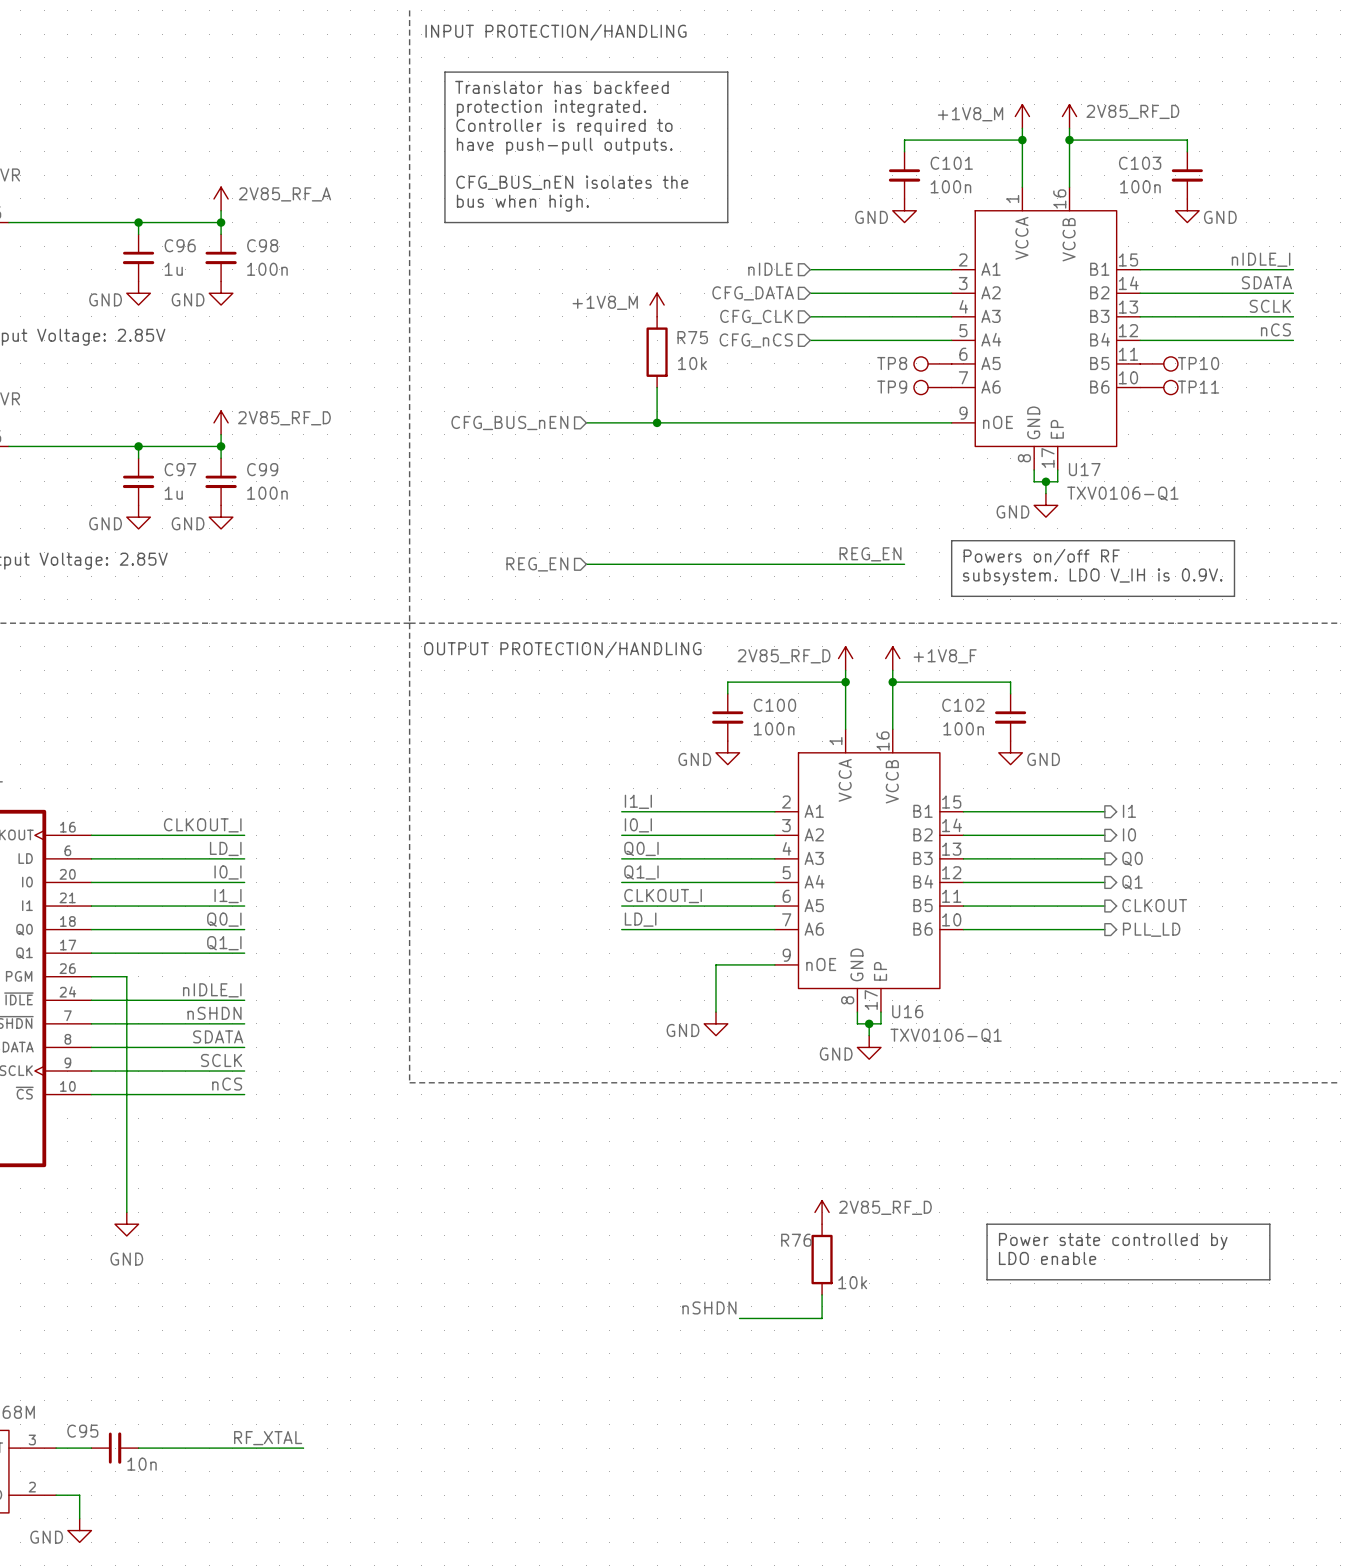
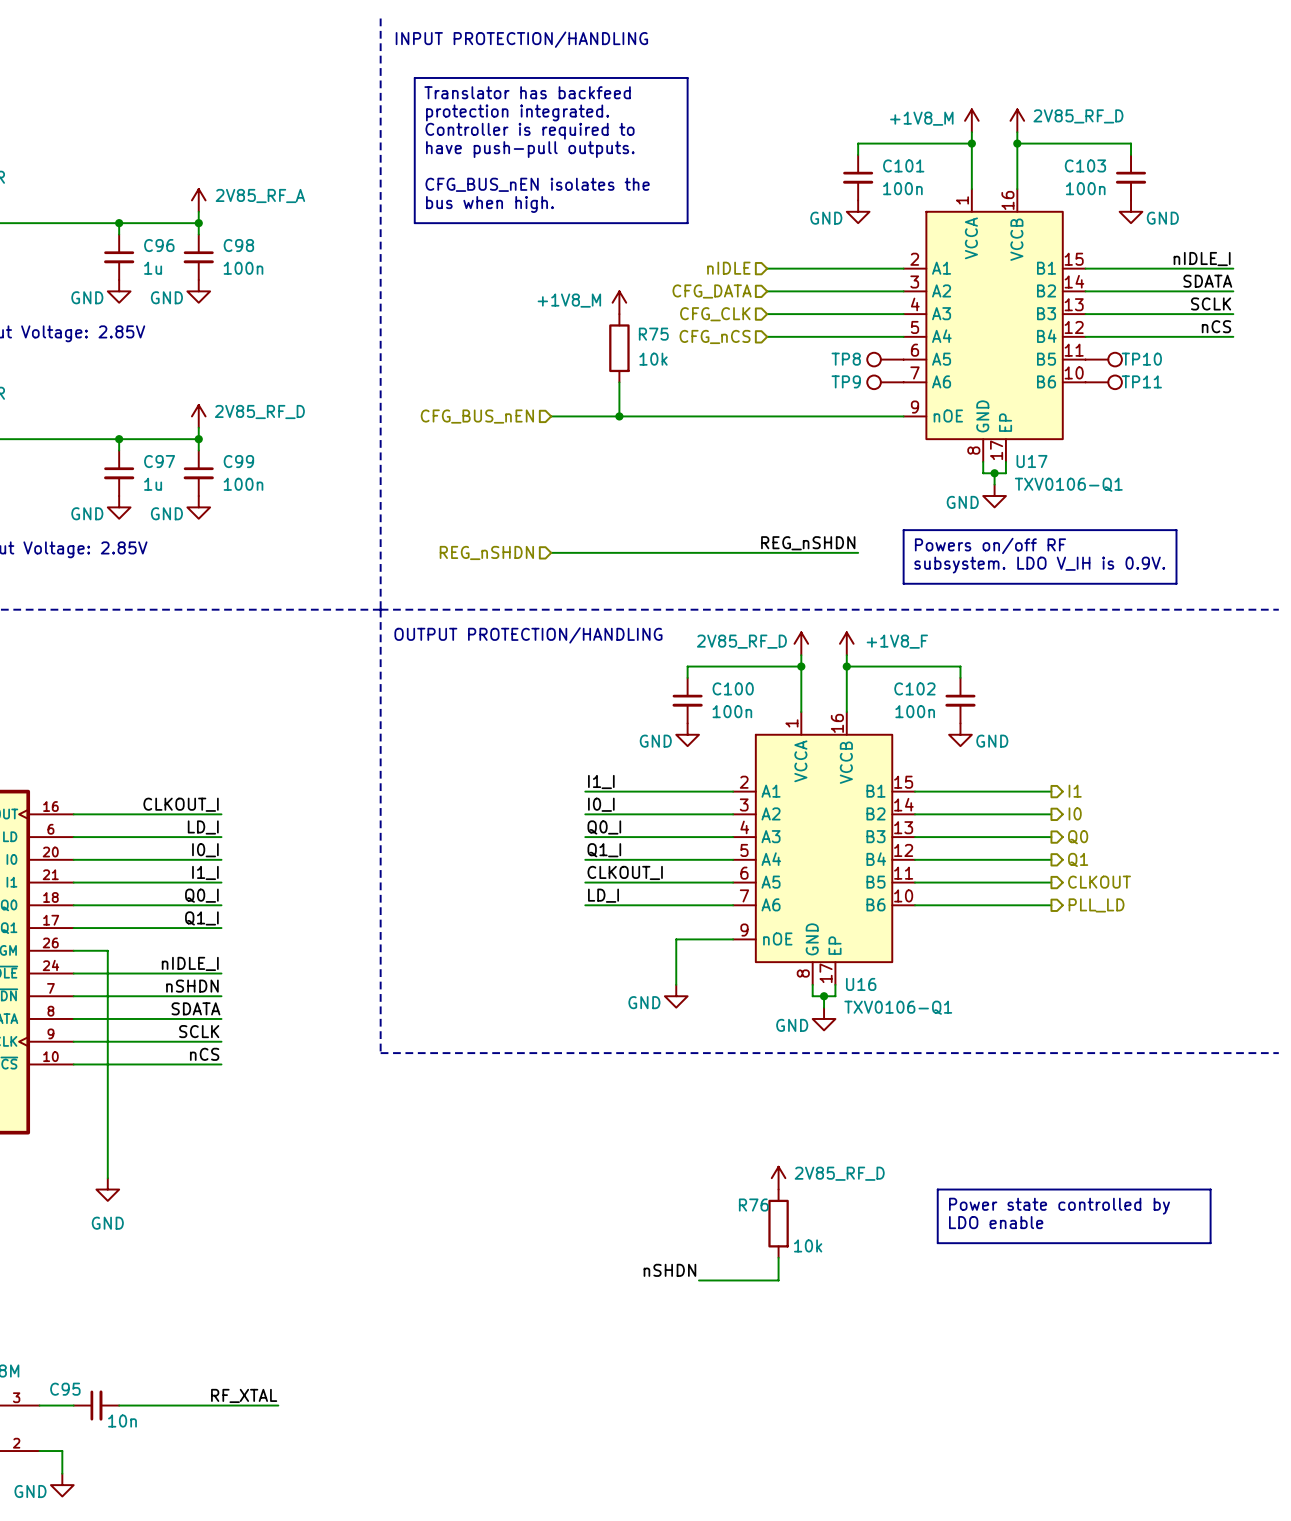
label: REG_EN (870, 554) -> REG_nSHDN (808, 543)
hierarchical label: REG_EN (537, 564) -> REG_nSHDN (486, 552)

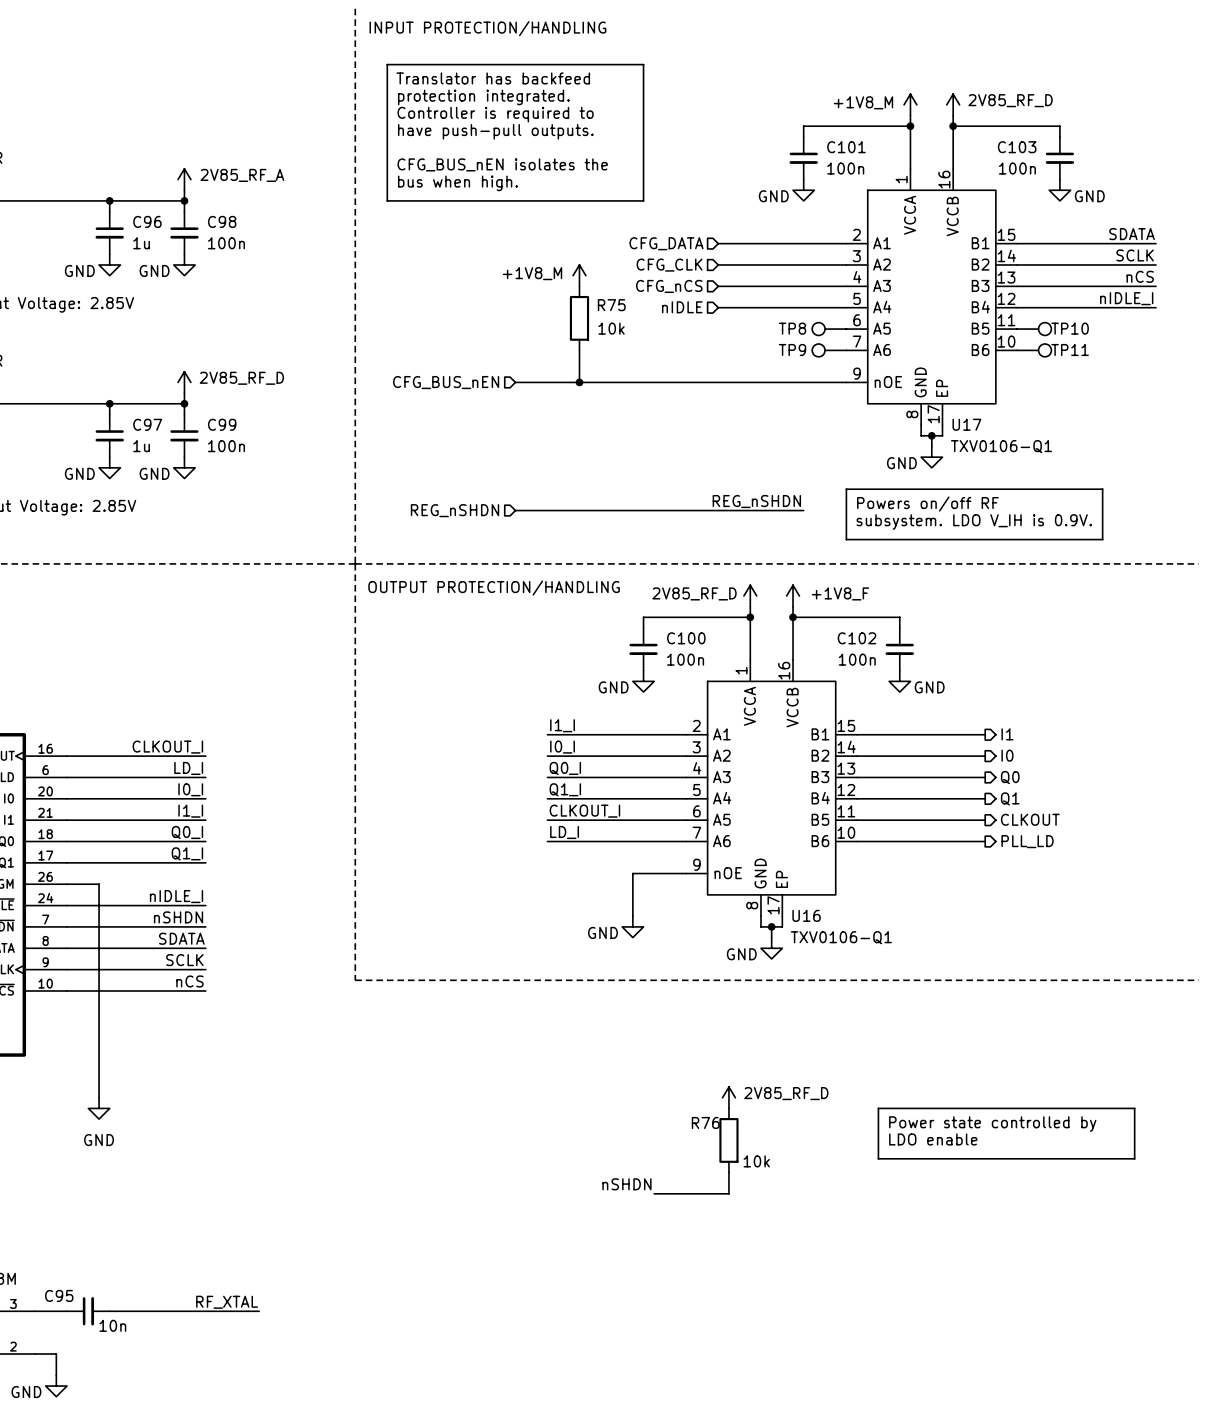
label: nIDLE_I (1202, 259) -> SDATA (1132, 234)
hierarchical label: nIDLE (728, 268) -> CFG_DATA (666, 243)
label: SDATA (1207, 281) -> SCLK (1135, 255)
hierarchical label: CFG_DATA (712, 291) -> CFG_CLK (669, 265)
label: SCLK (1211, 303) -> nCS (1140, 276)
hierarchical label: CFG_CLK (715, 314) -> CFG_nCS (669, 286)
label: nCS (1216, 326) -> nIDLE_I (1126, 298)
hierarchical label: CFG_nCS (715, 336) -> nIDLE (682, 307)

